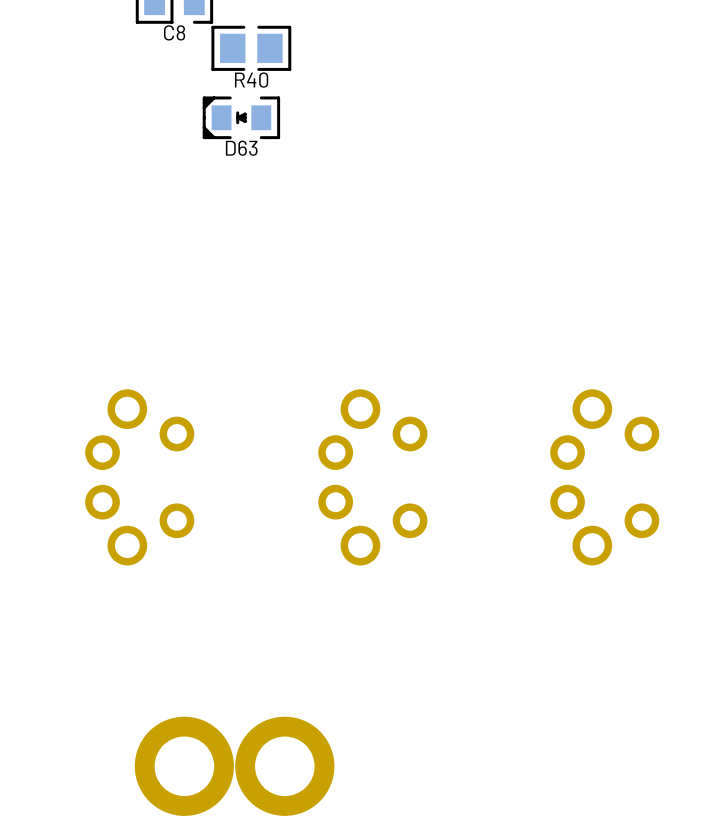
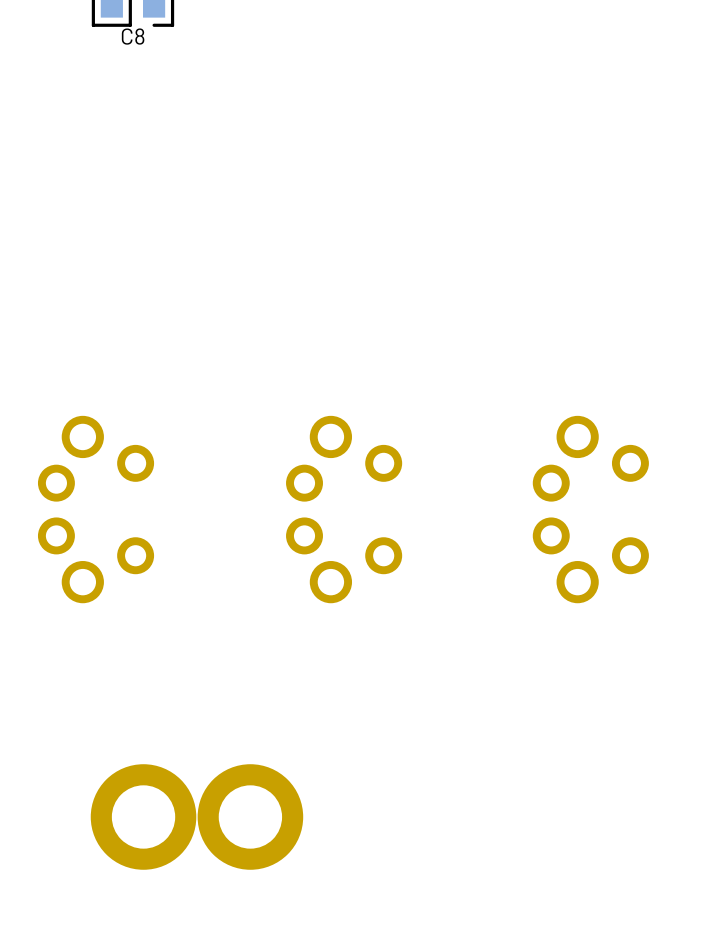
R40: (251, 48) -> none
D63: (241, 117) -> none

